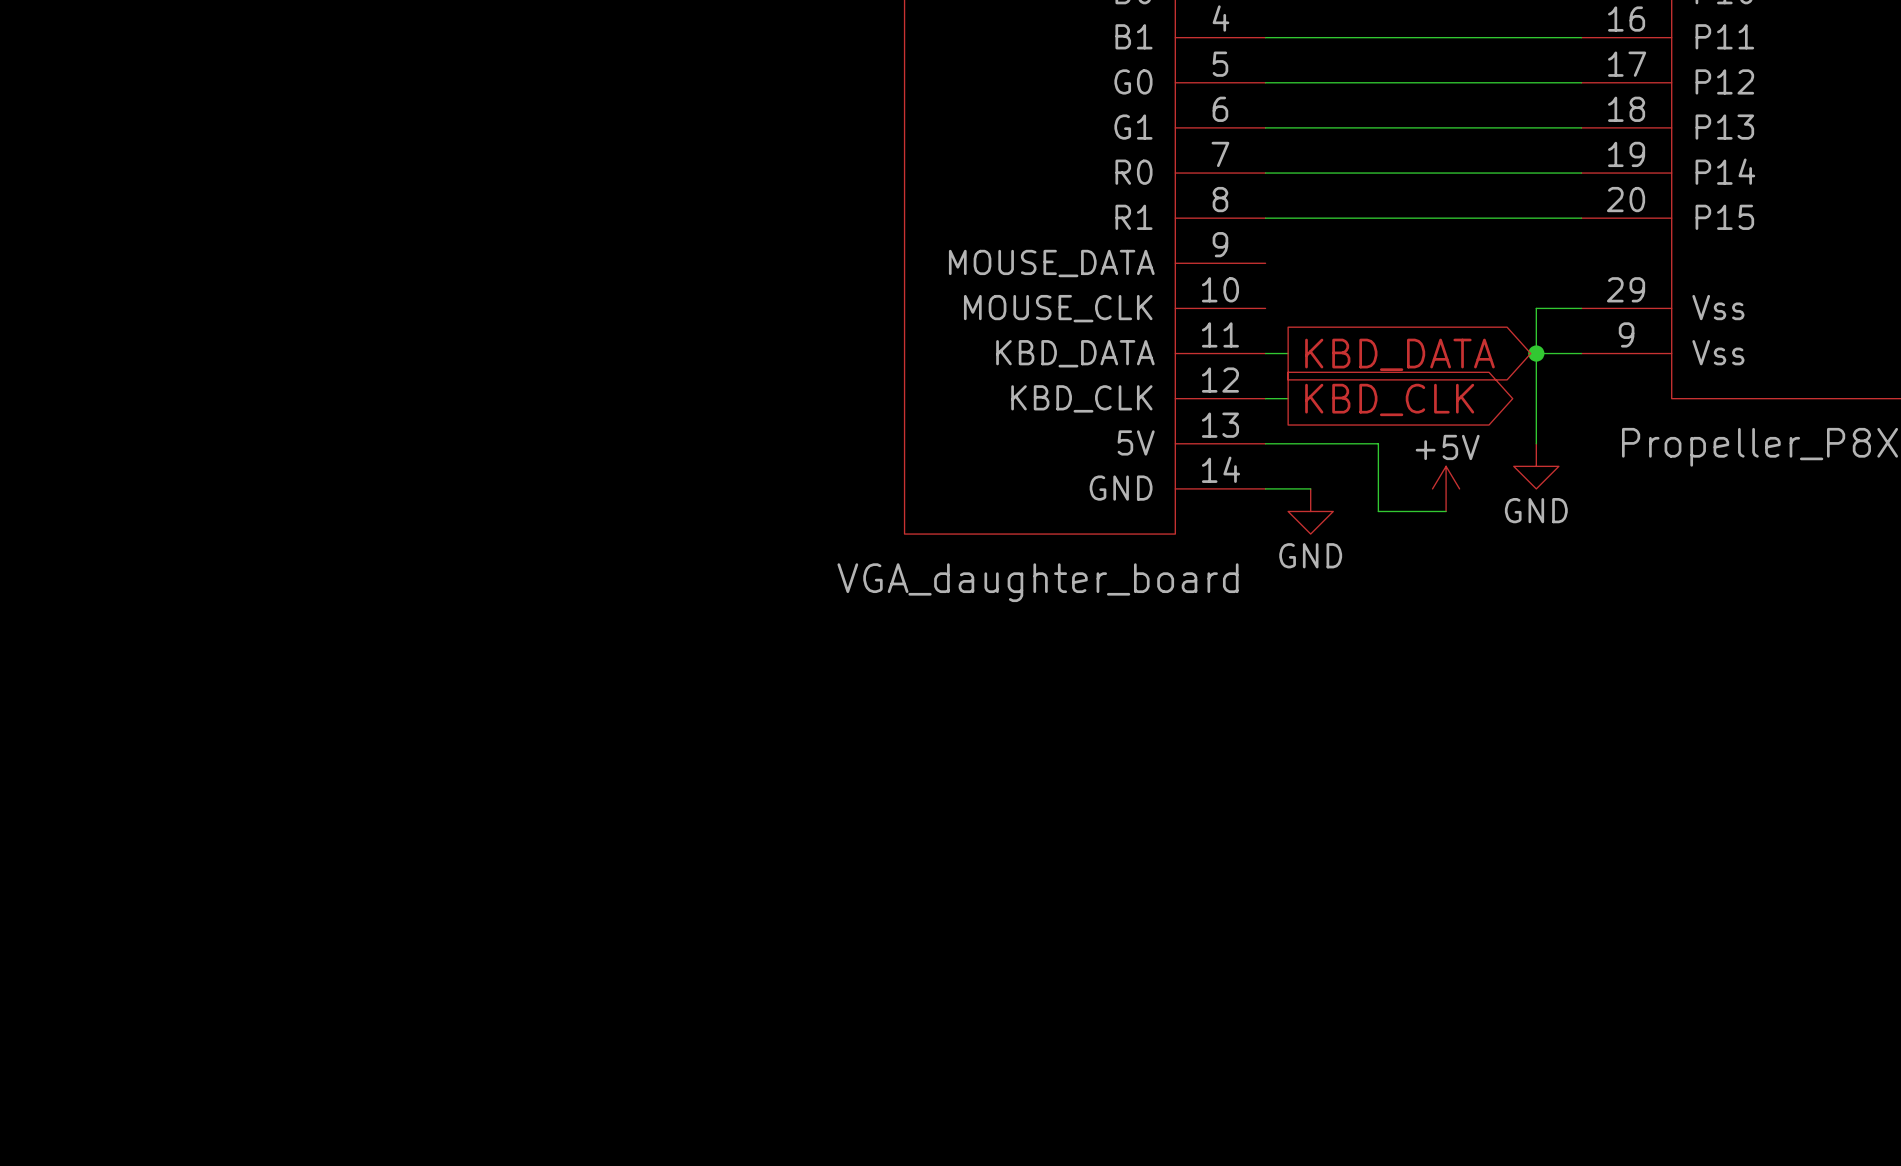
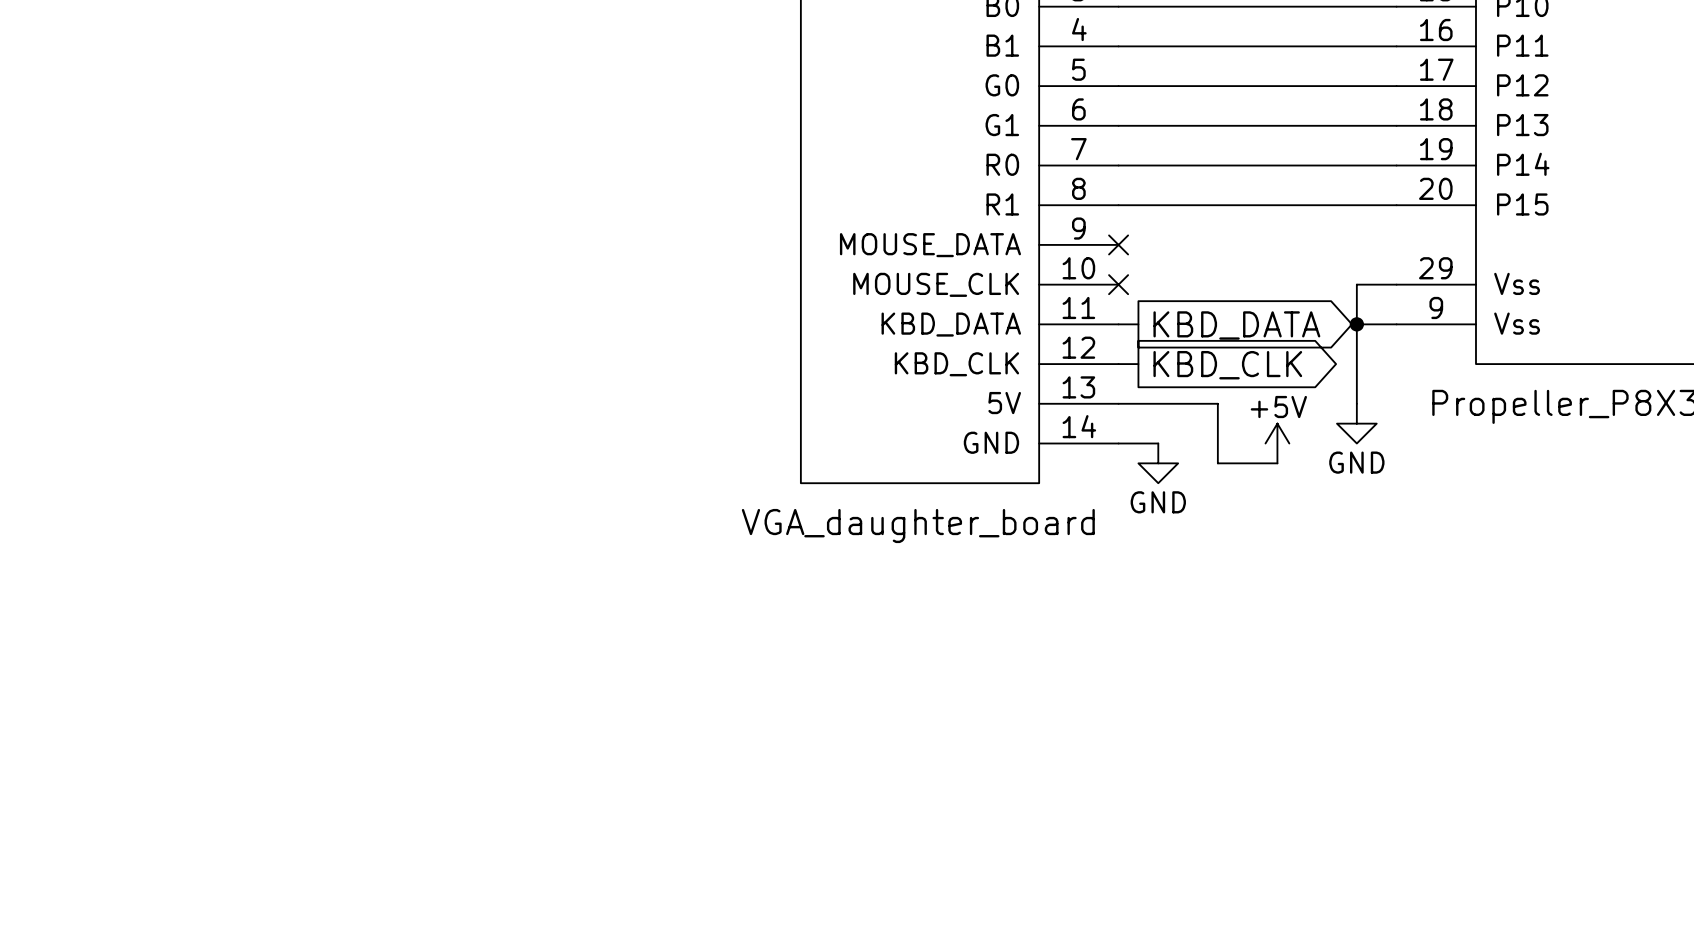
no-connect mark: none -> (1118, 244)
no-connect mark: none -> (1118, 284)

